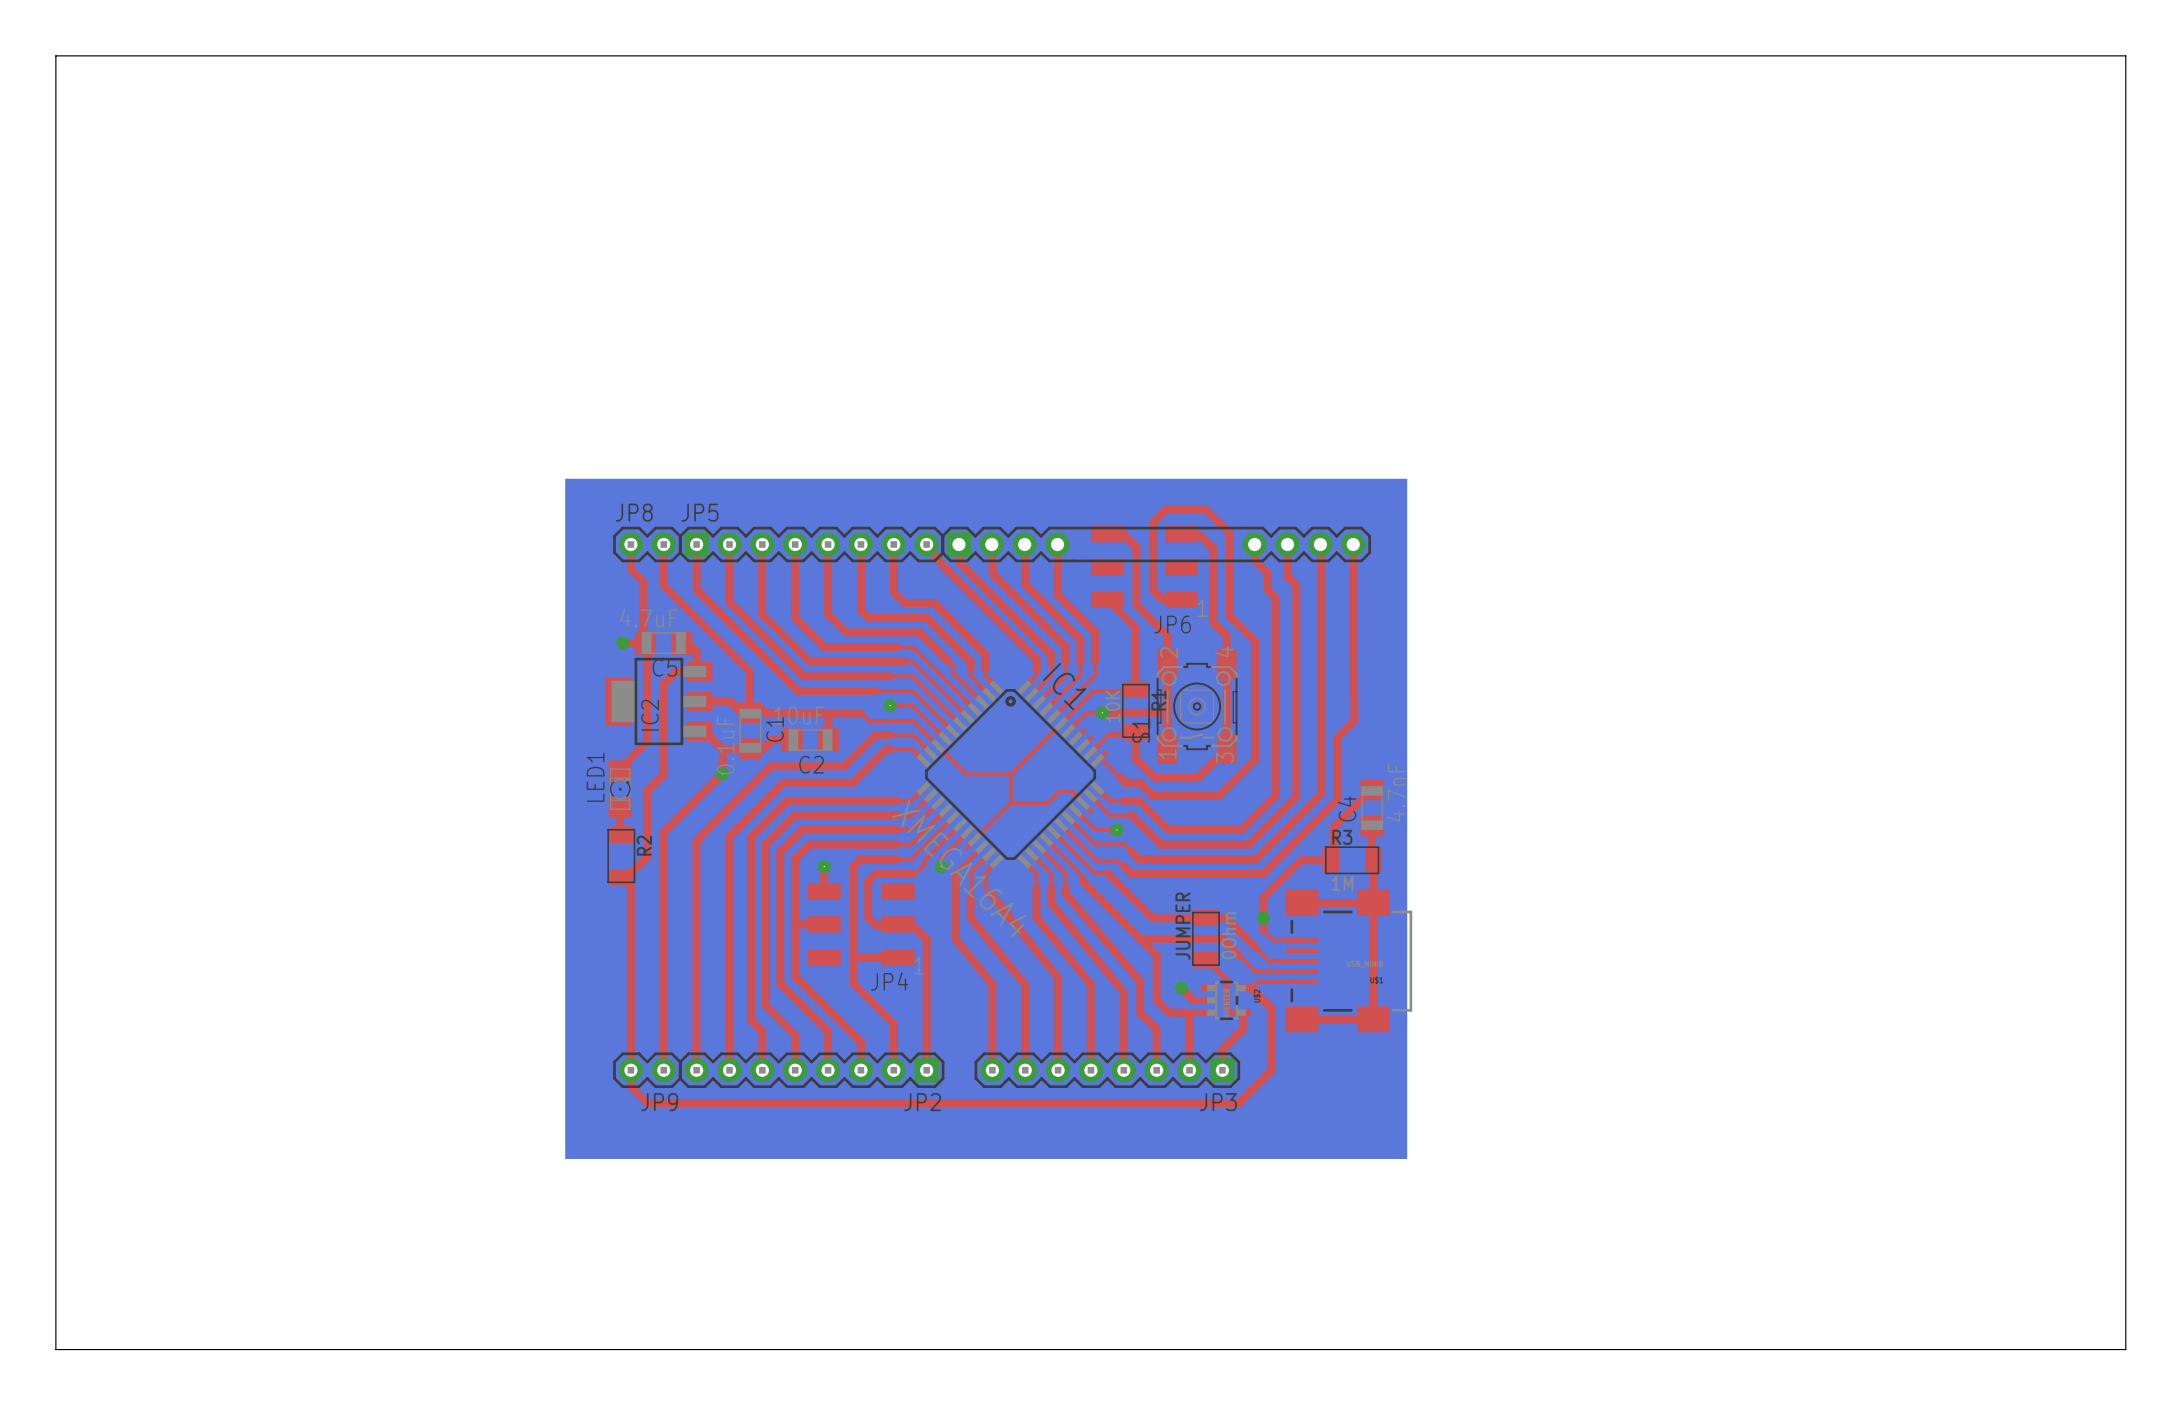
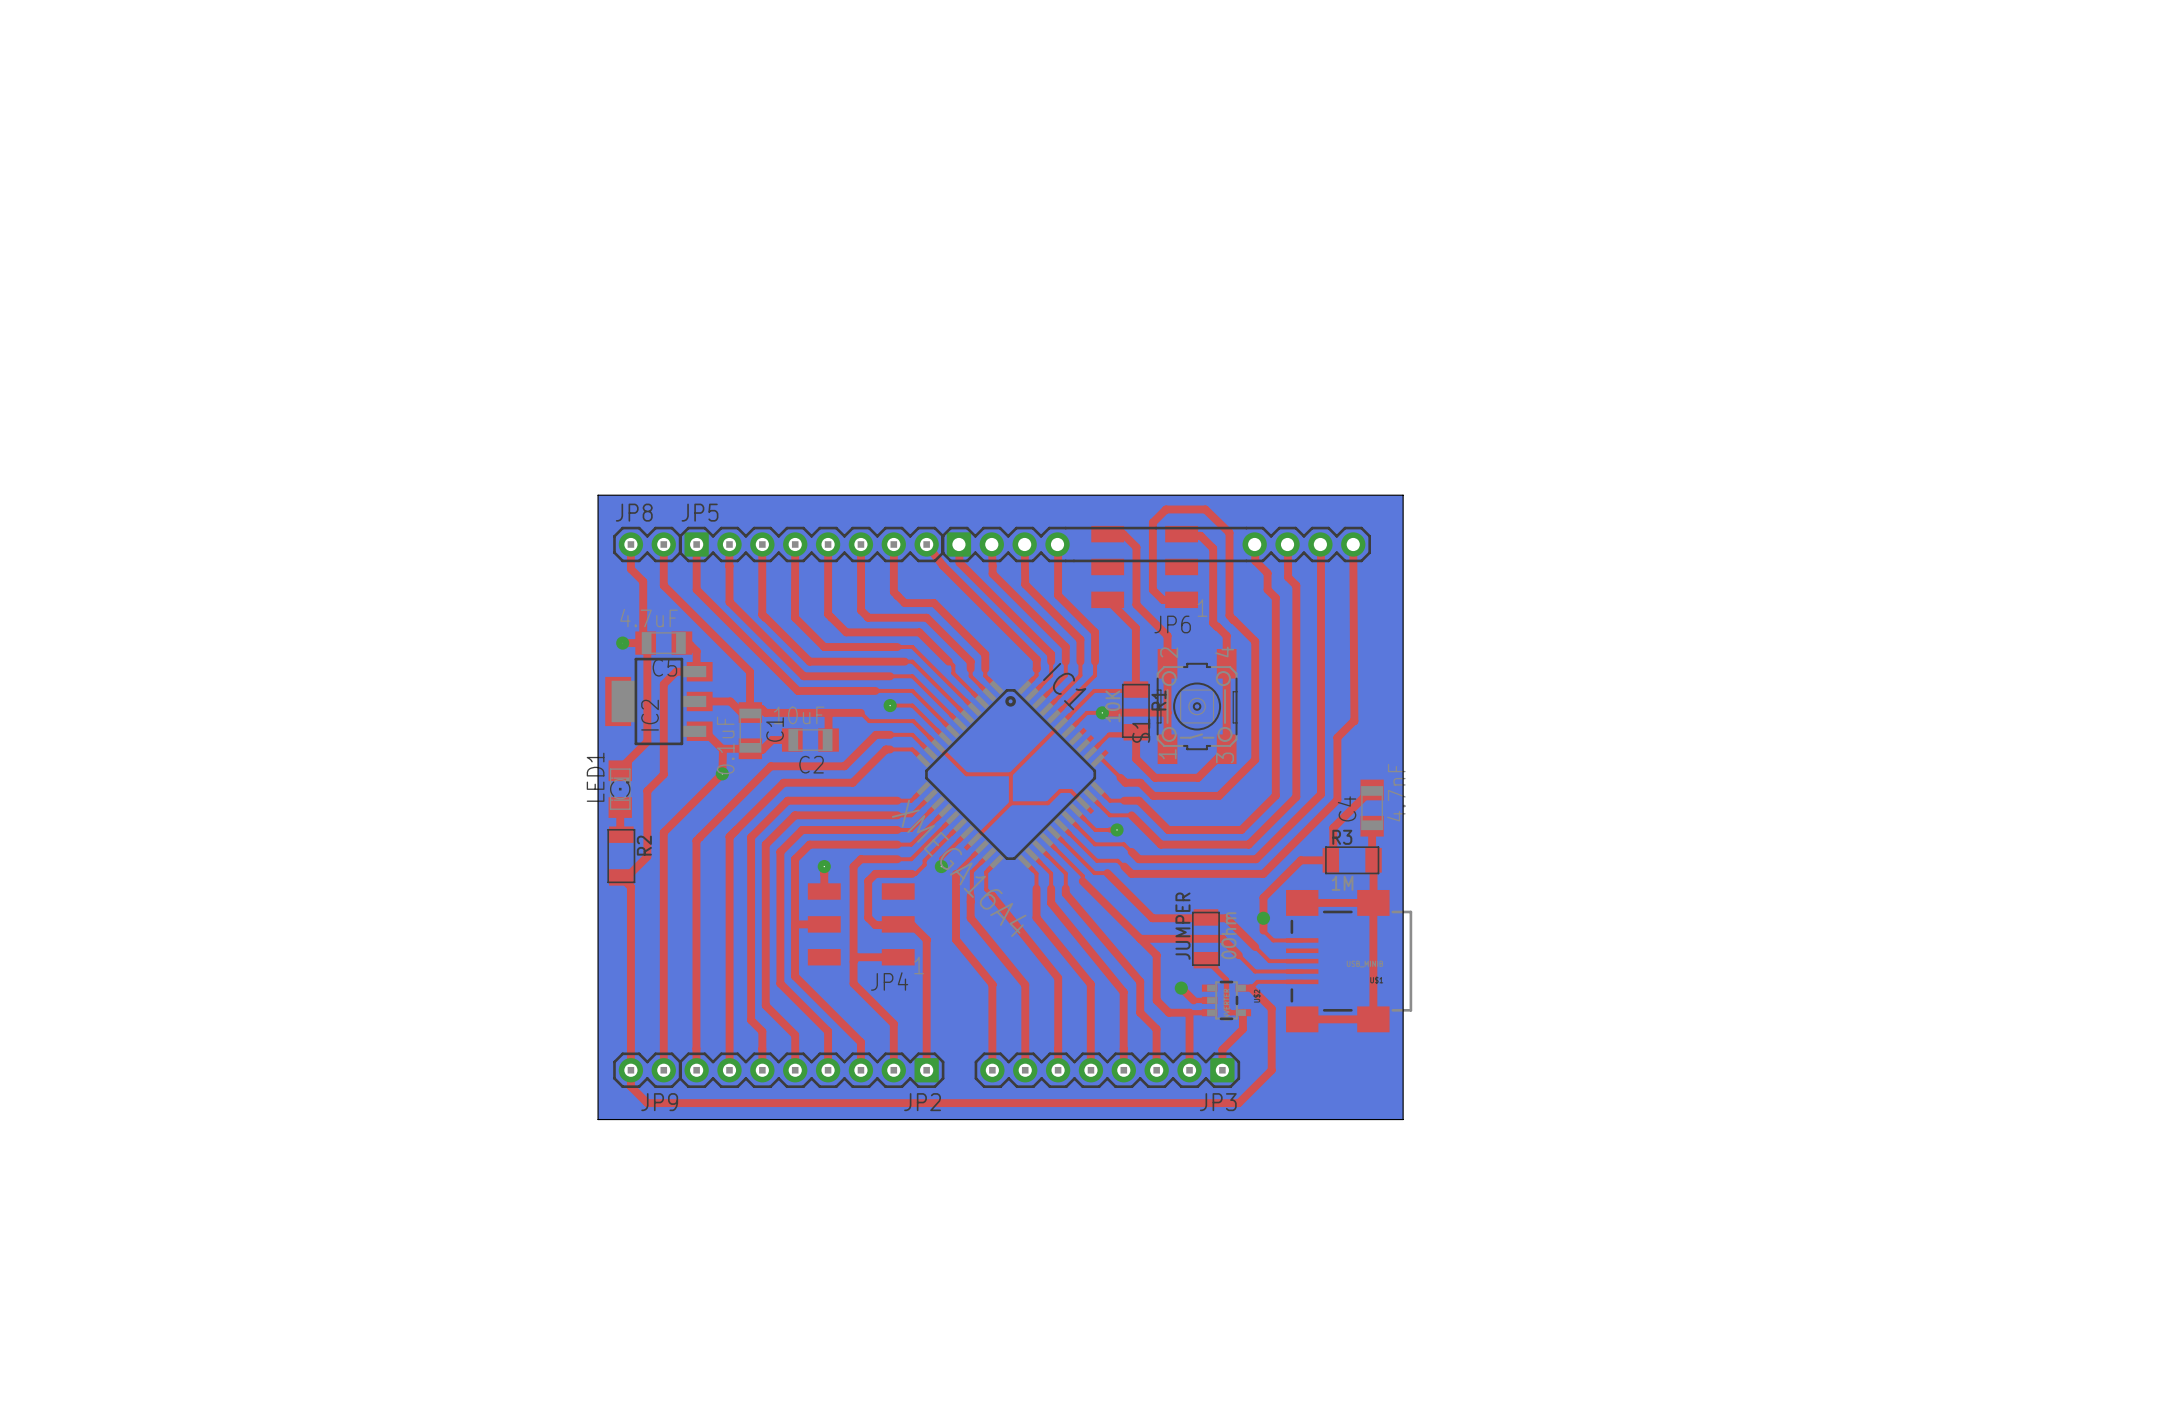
board edge: (55, 55) (2125, 55) (2125, 1349) (55, 1349) (55, 55) -> none
drawing: [565, 478, 1408, 1159] -> none
board edge: none -> (598, 495) (1403, 495) (1403, 1119) (598, 1119) (598, 495)
drawing: none -> [598, 495, 1404, 1120]

